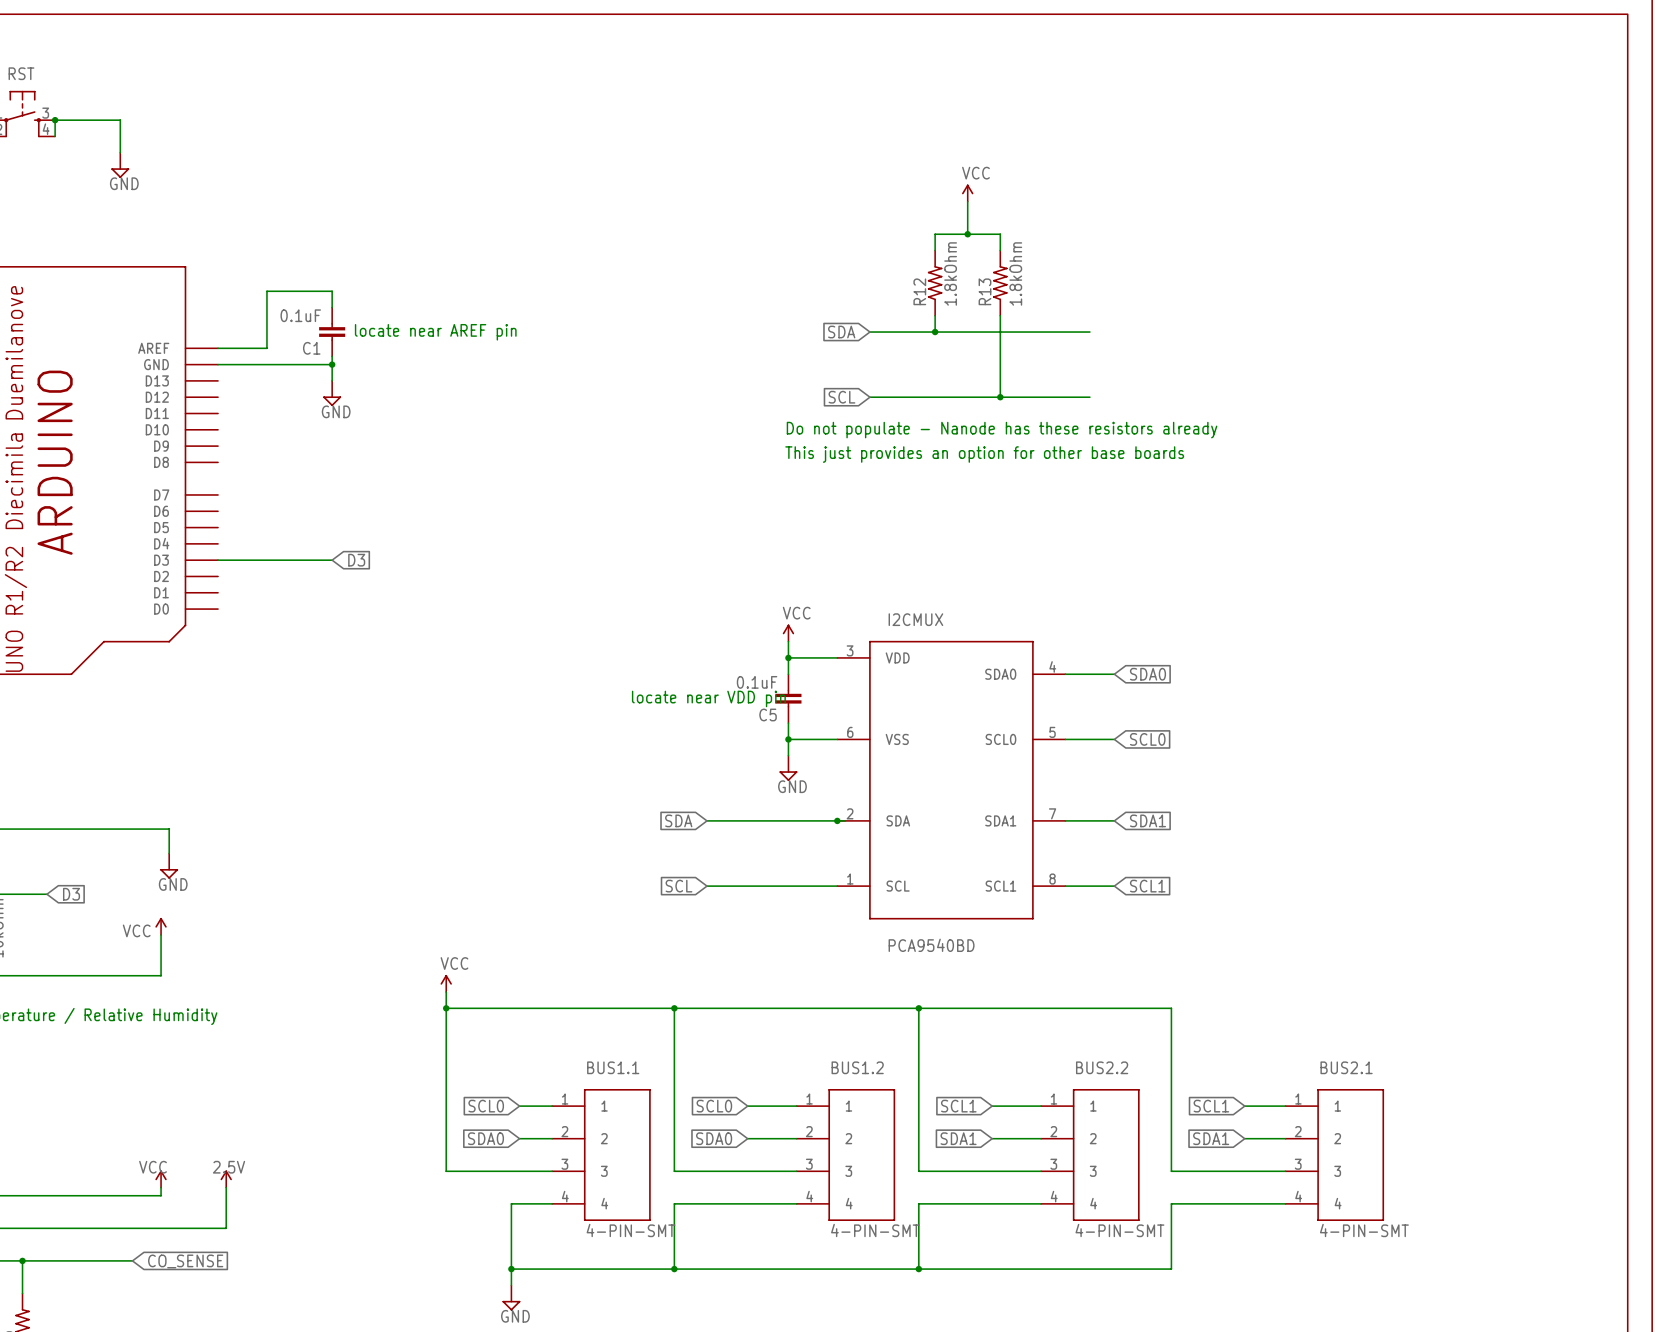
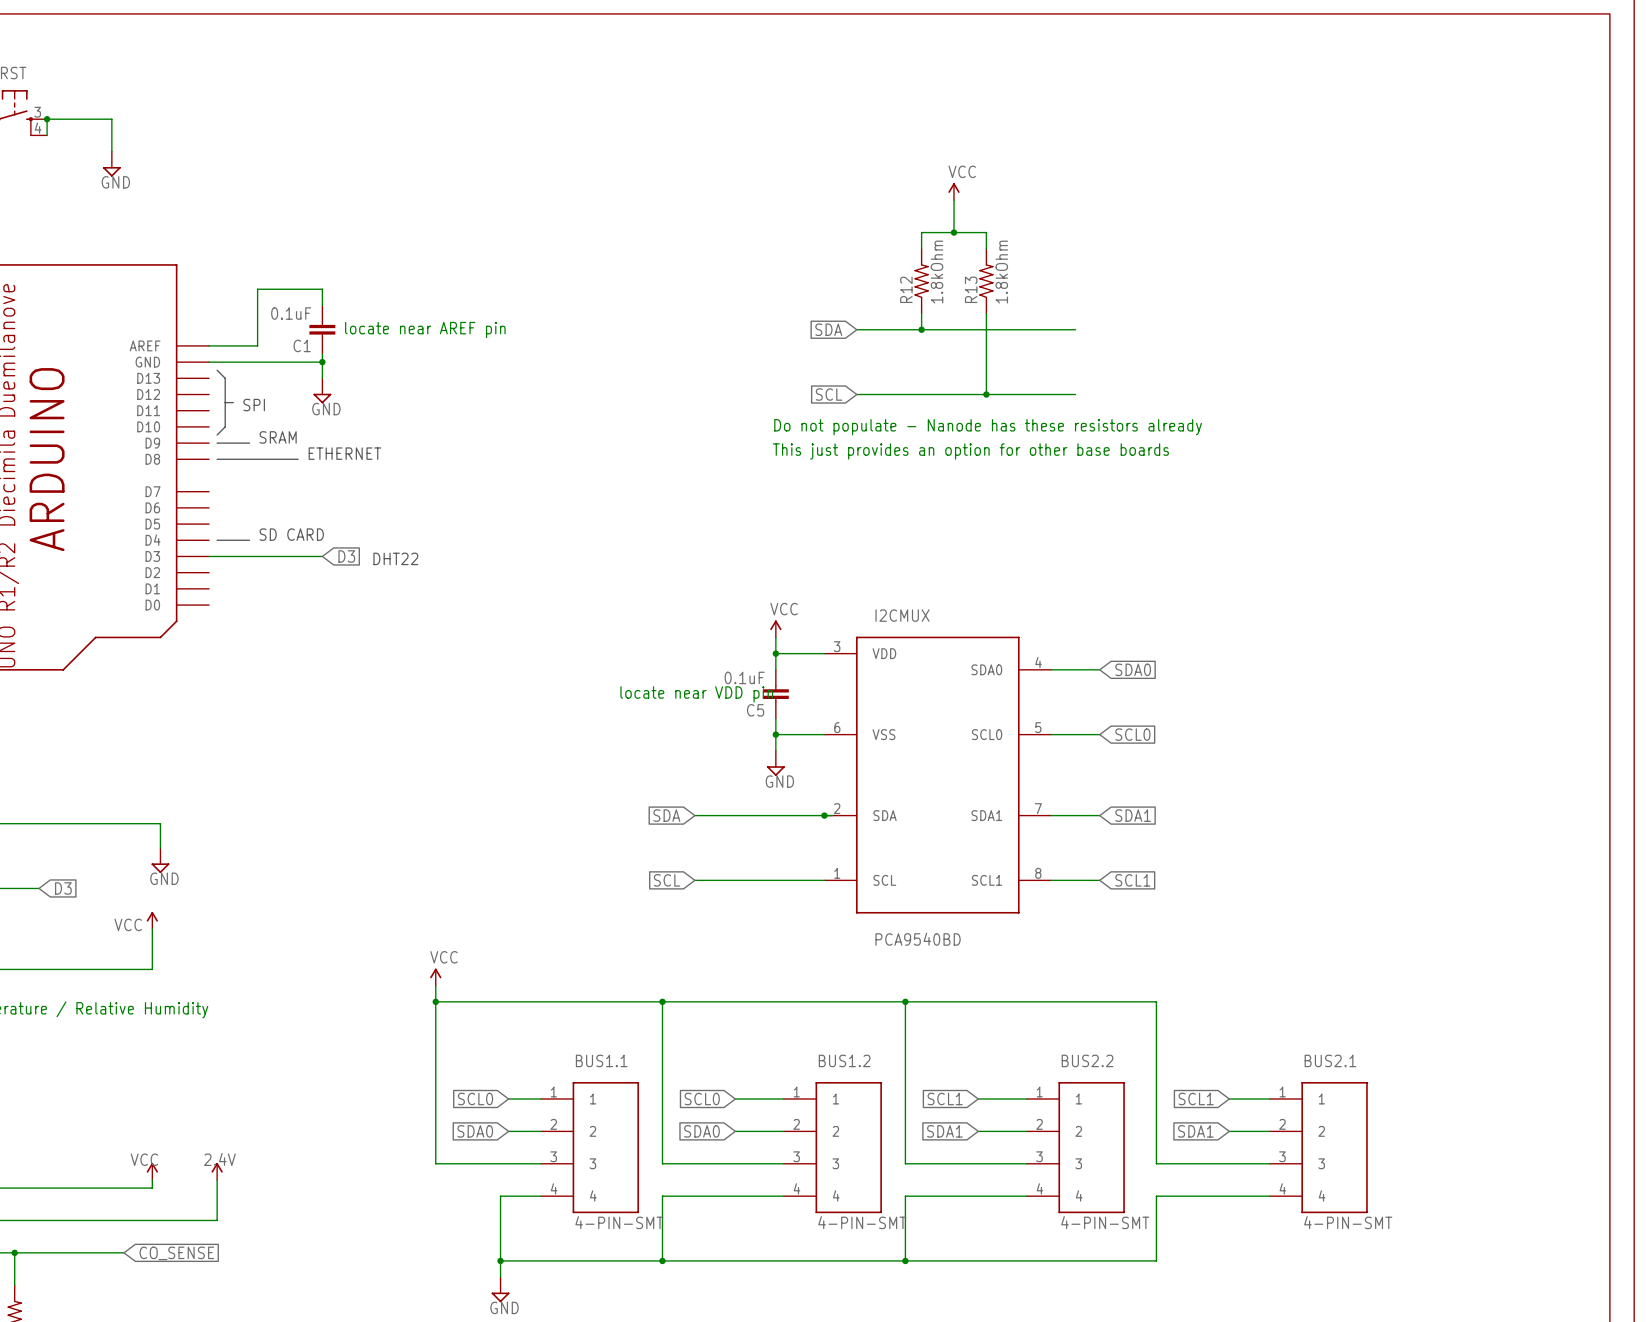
line: none -> (217, 370) (225, 378) (225, 426) (217, 435)
line: none -> (225, 402) (233, 402)
text: none -> SPI (254, 405)
text: none -> SRAM (278, 437)
line: none -> (217, 443) (249, 443)
text: none -> ETHERNET (344, 453)
line: none -> (217, 459) (298, 459)
text: none -> SD CARD (291, 534)
line: none -> (217, 540) (249, 540)
text: none -> DHT22 (395, 558)
power symbol: 2.5V (226, 1179) -> 2.4V (217, 1171)

